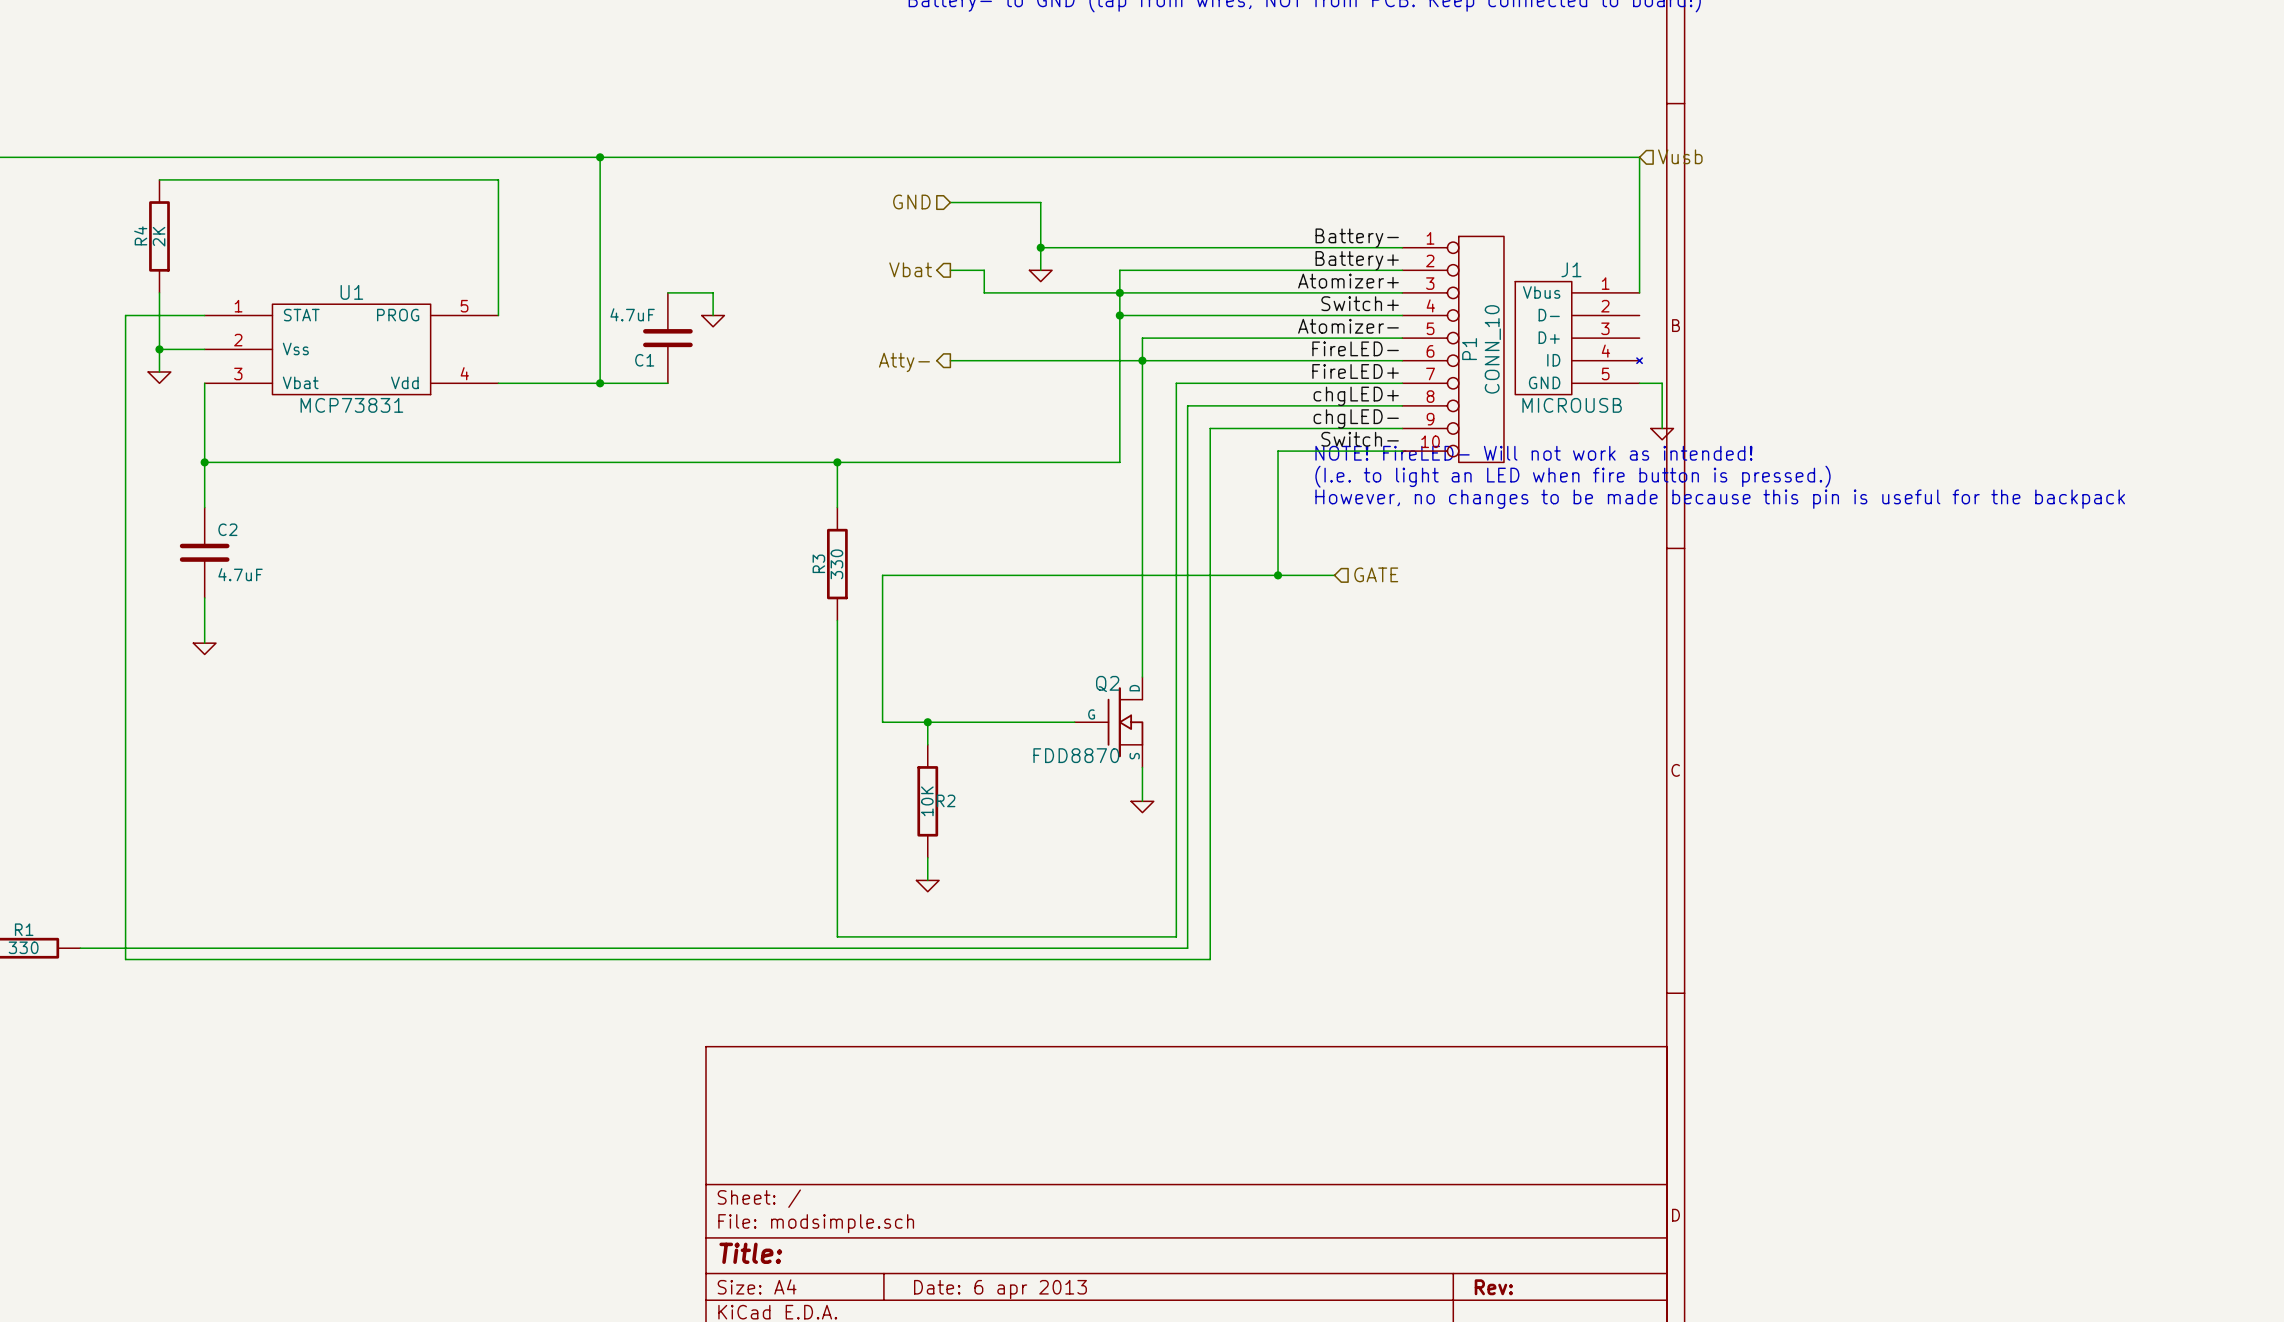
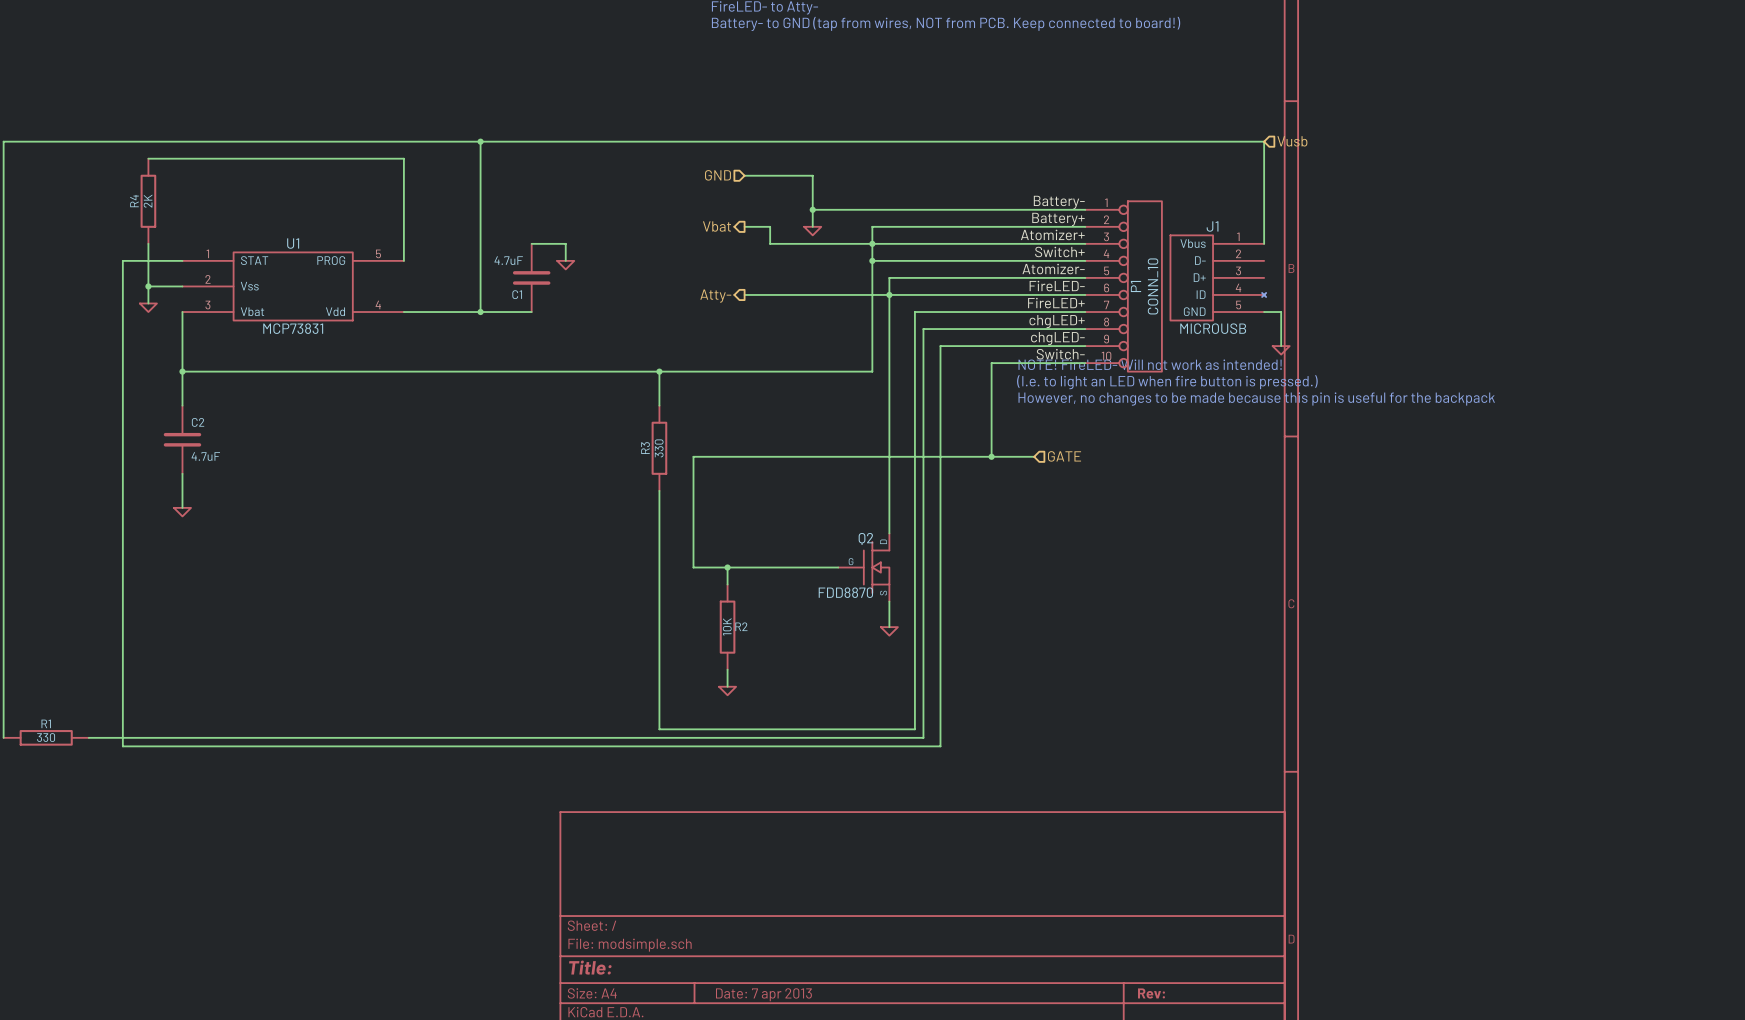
title block: Date: 6 apr 2013 (1000, 1289) -> Date: 7 apr 2013 (763, 994)

